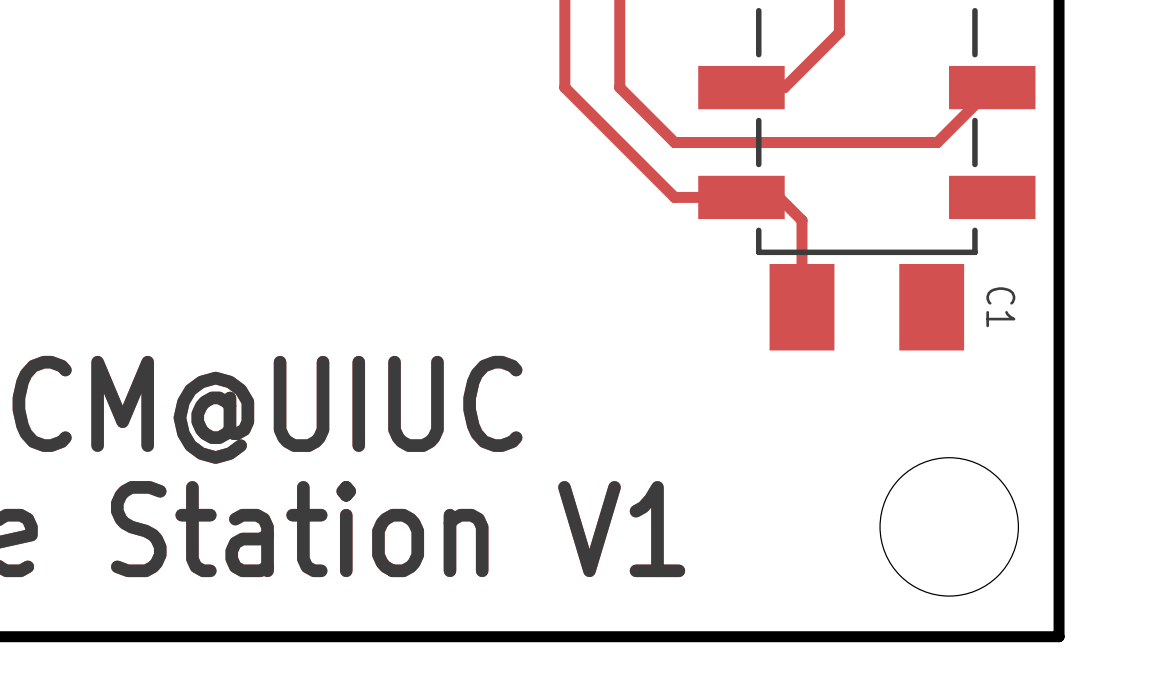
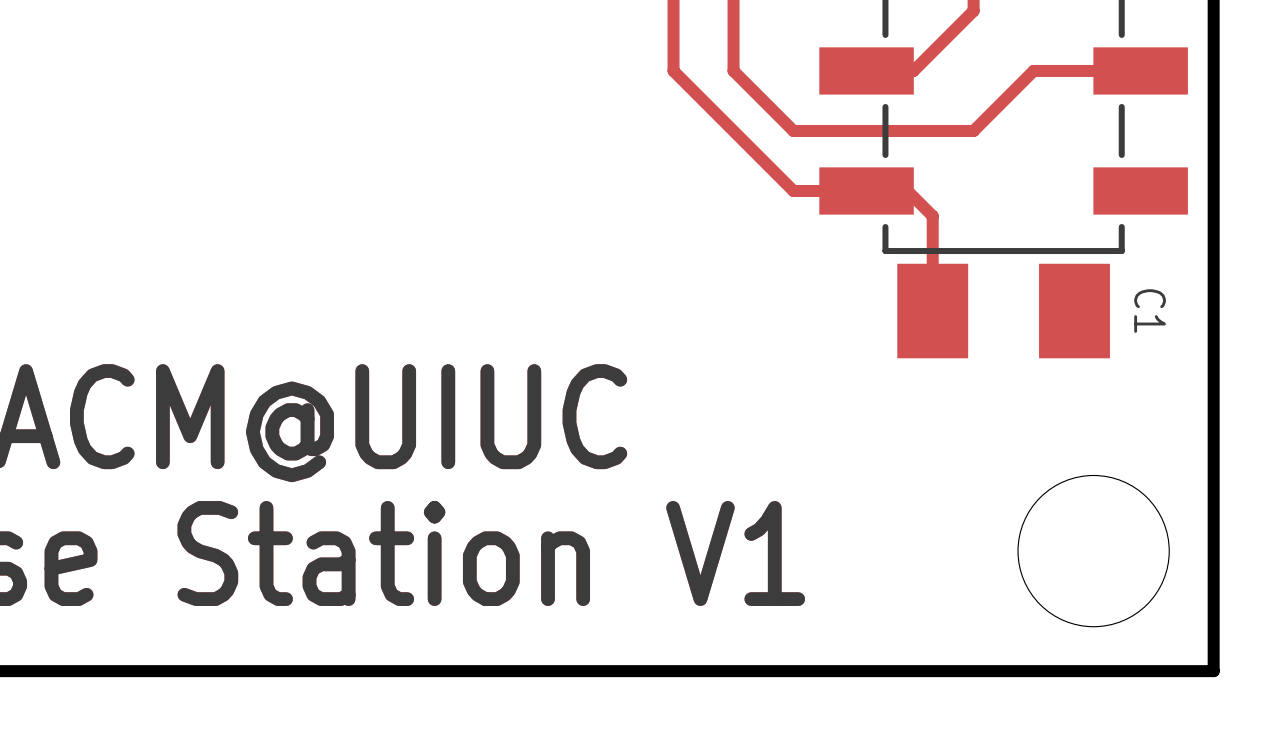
track: (992, 87) (937, 142) (839, 142) -> (1140, 70) (1033, 70) (973, 130)

